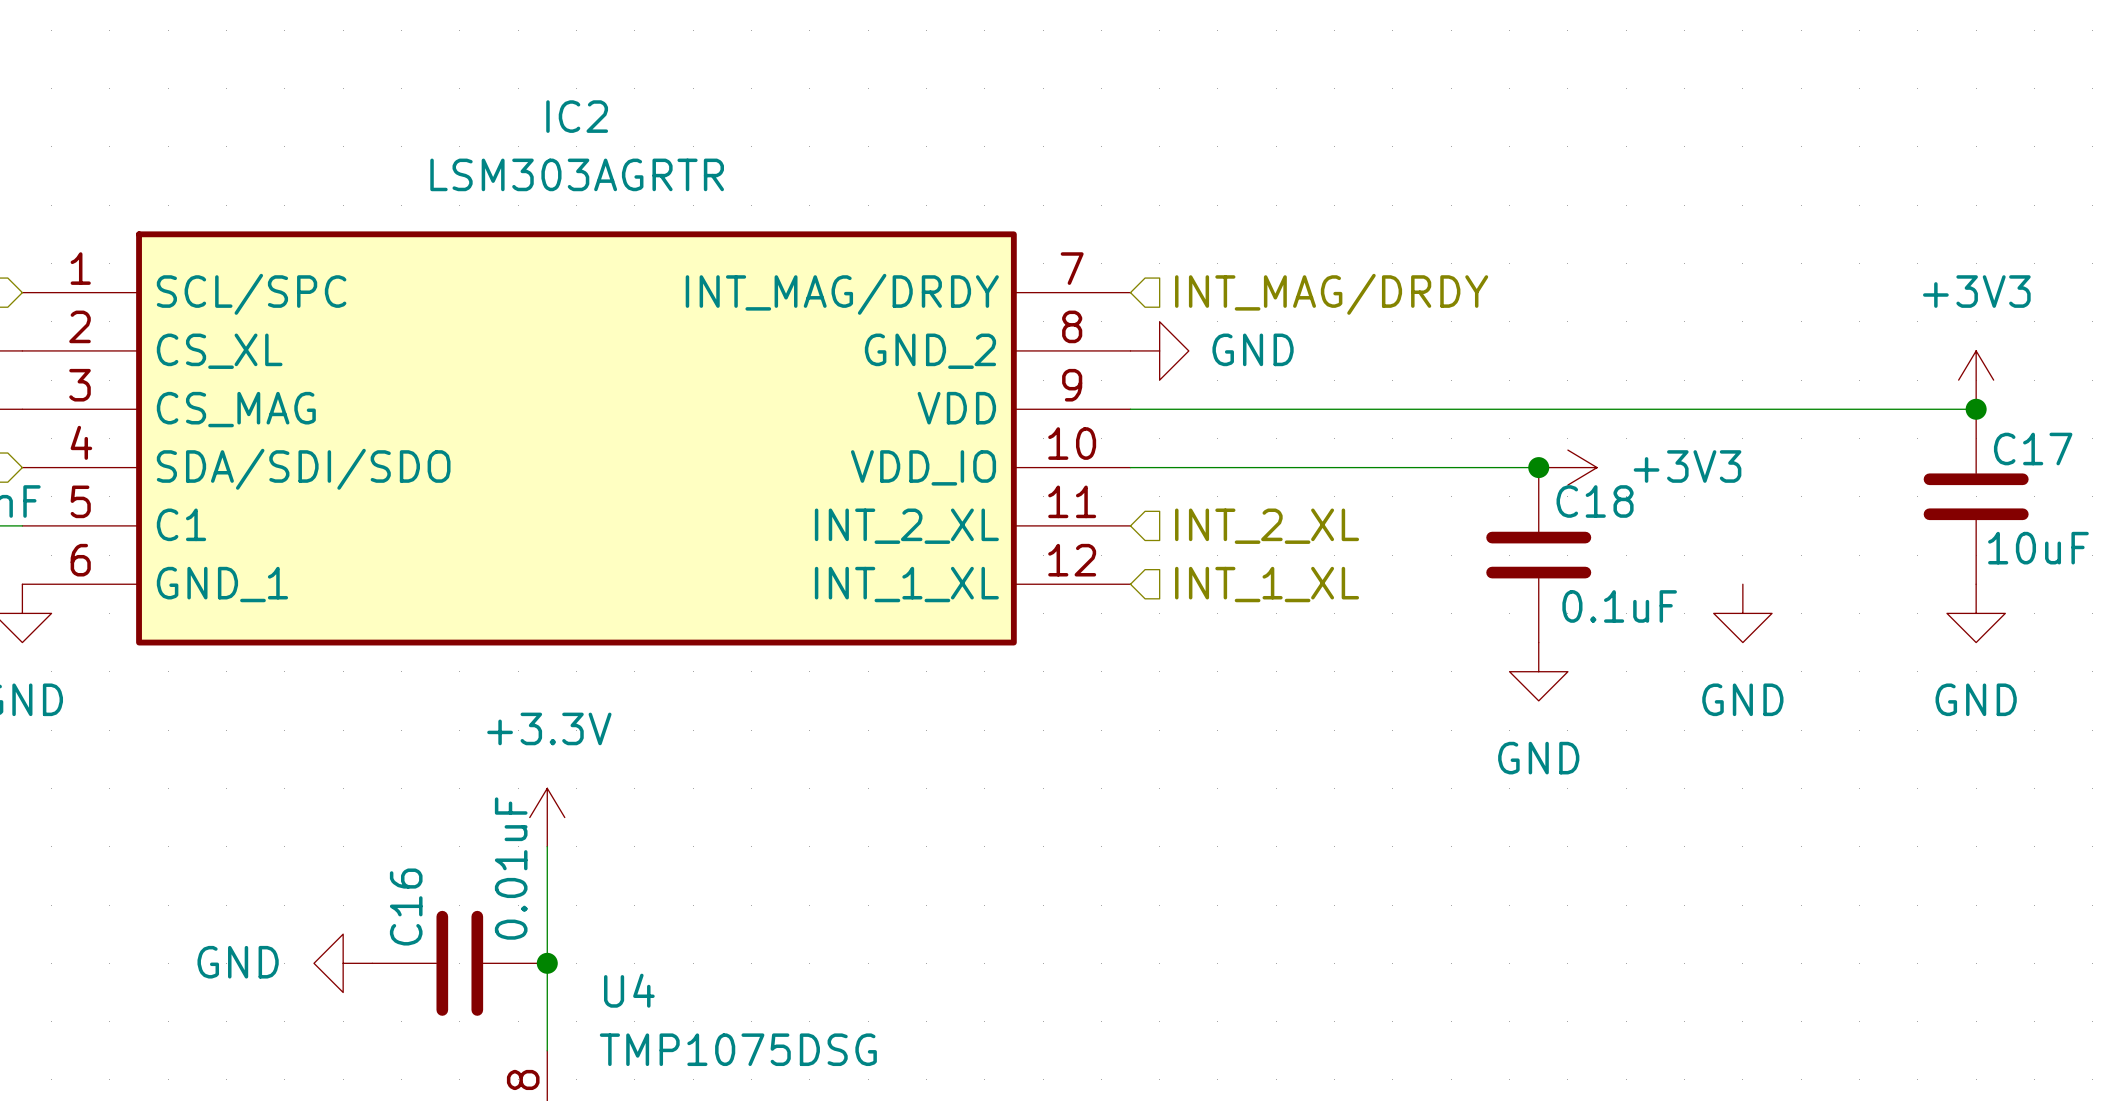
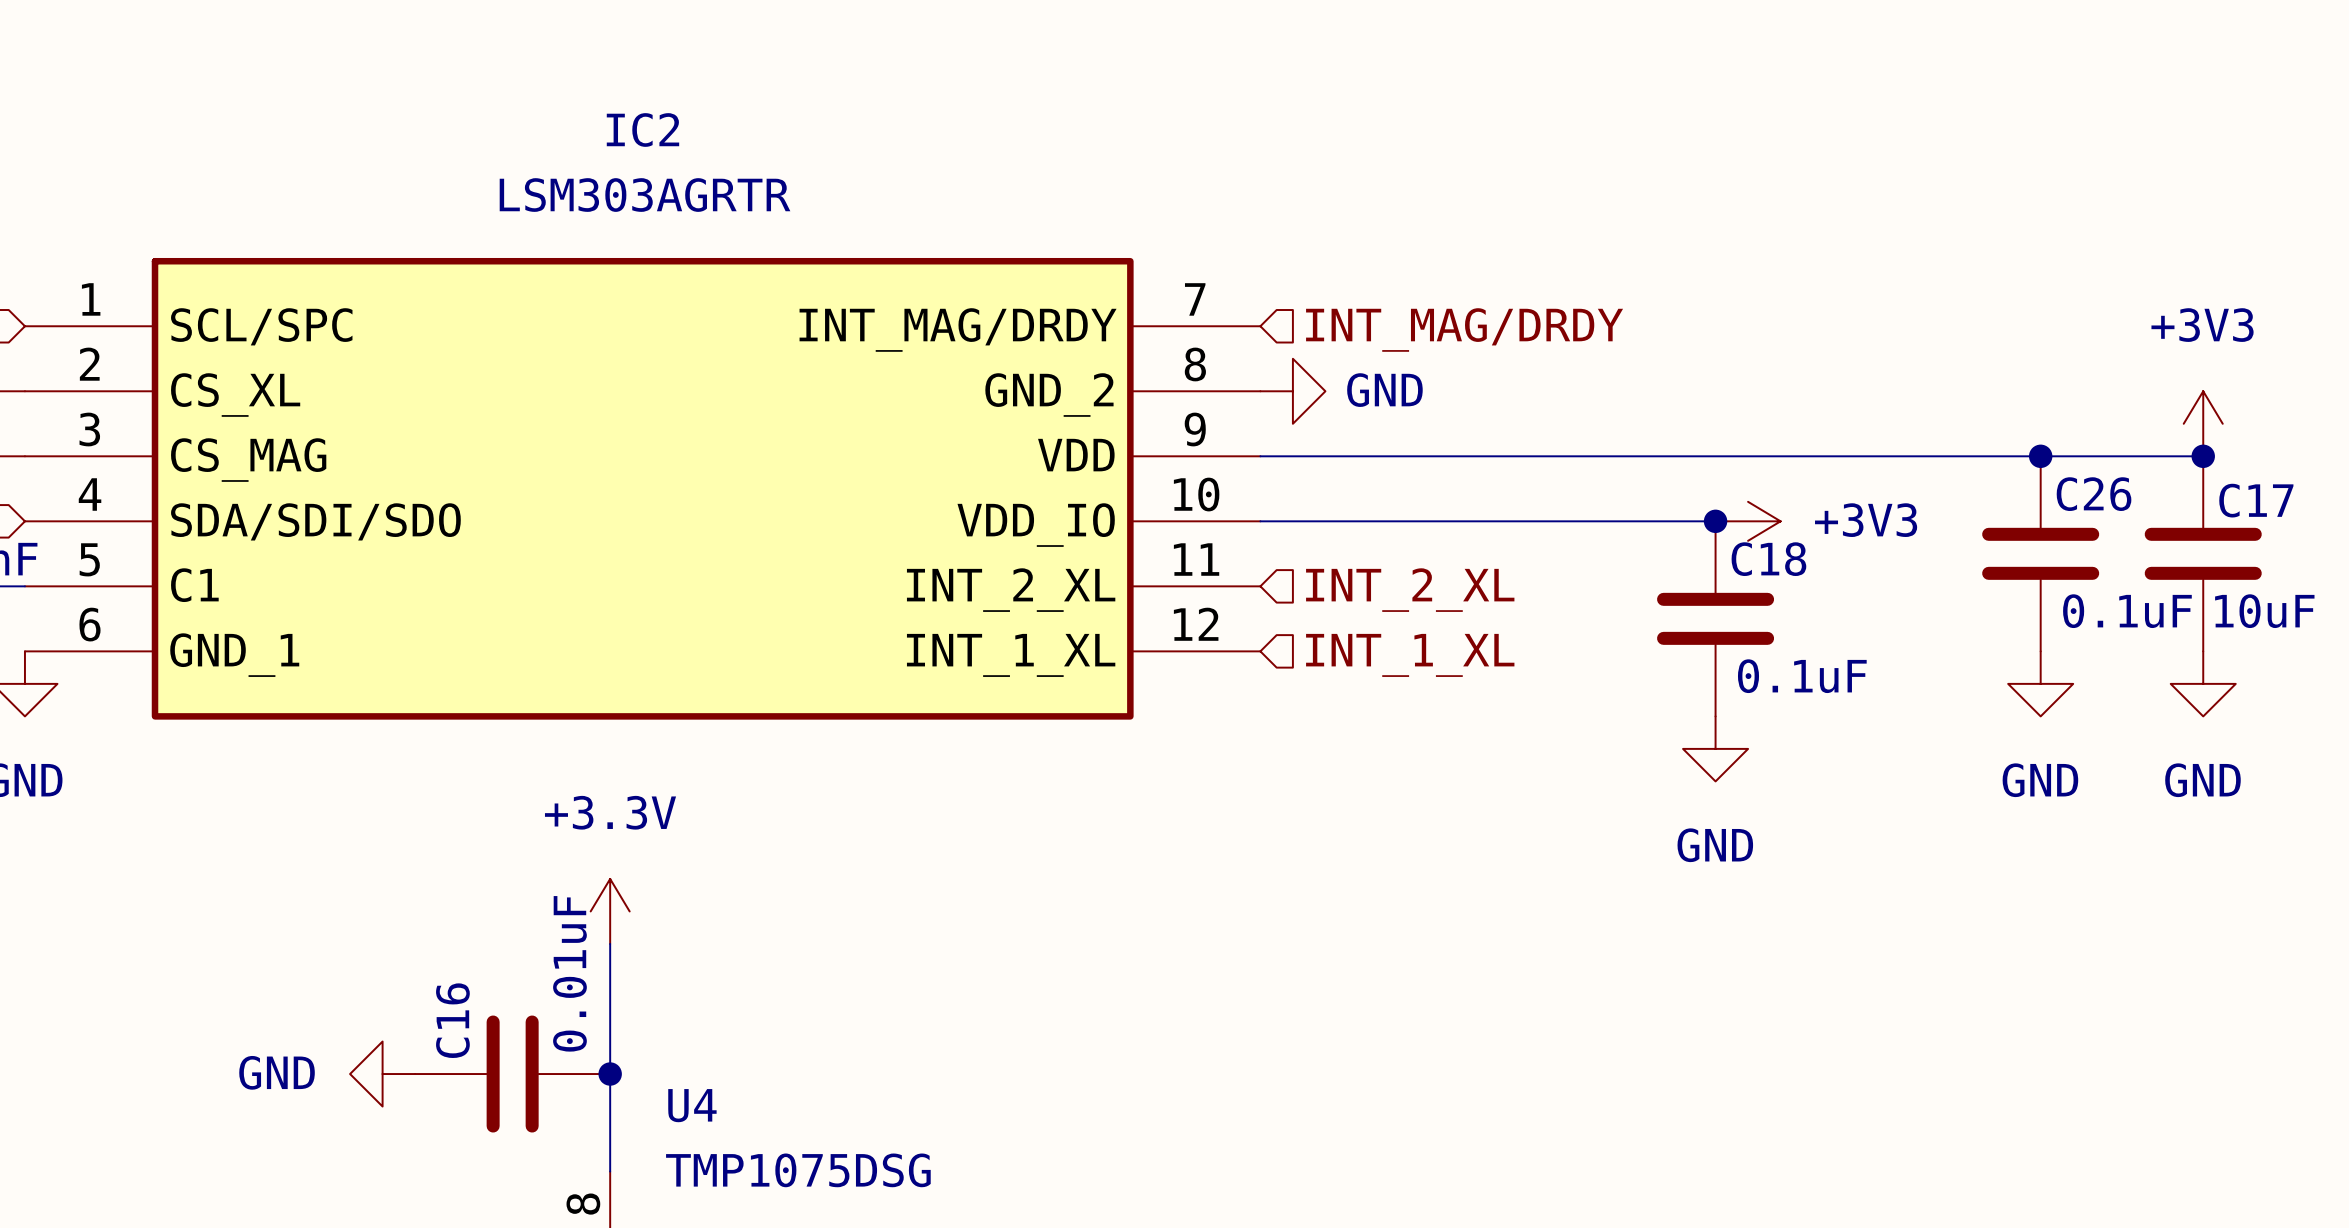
junction: none -> (2040, 456)
C26: none -> 0.1uF (2040, 553)
power symbol position: GND (1742, 613) -> GND (2040, 683)

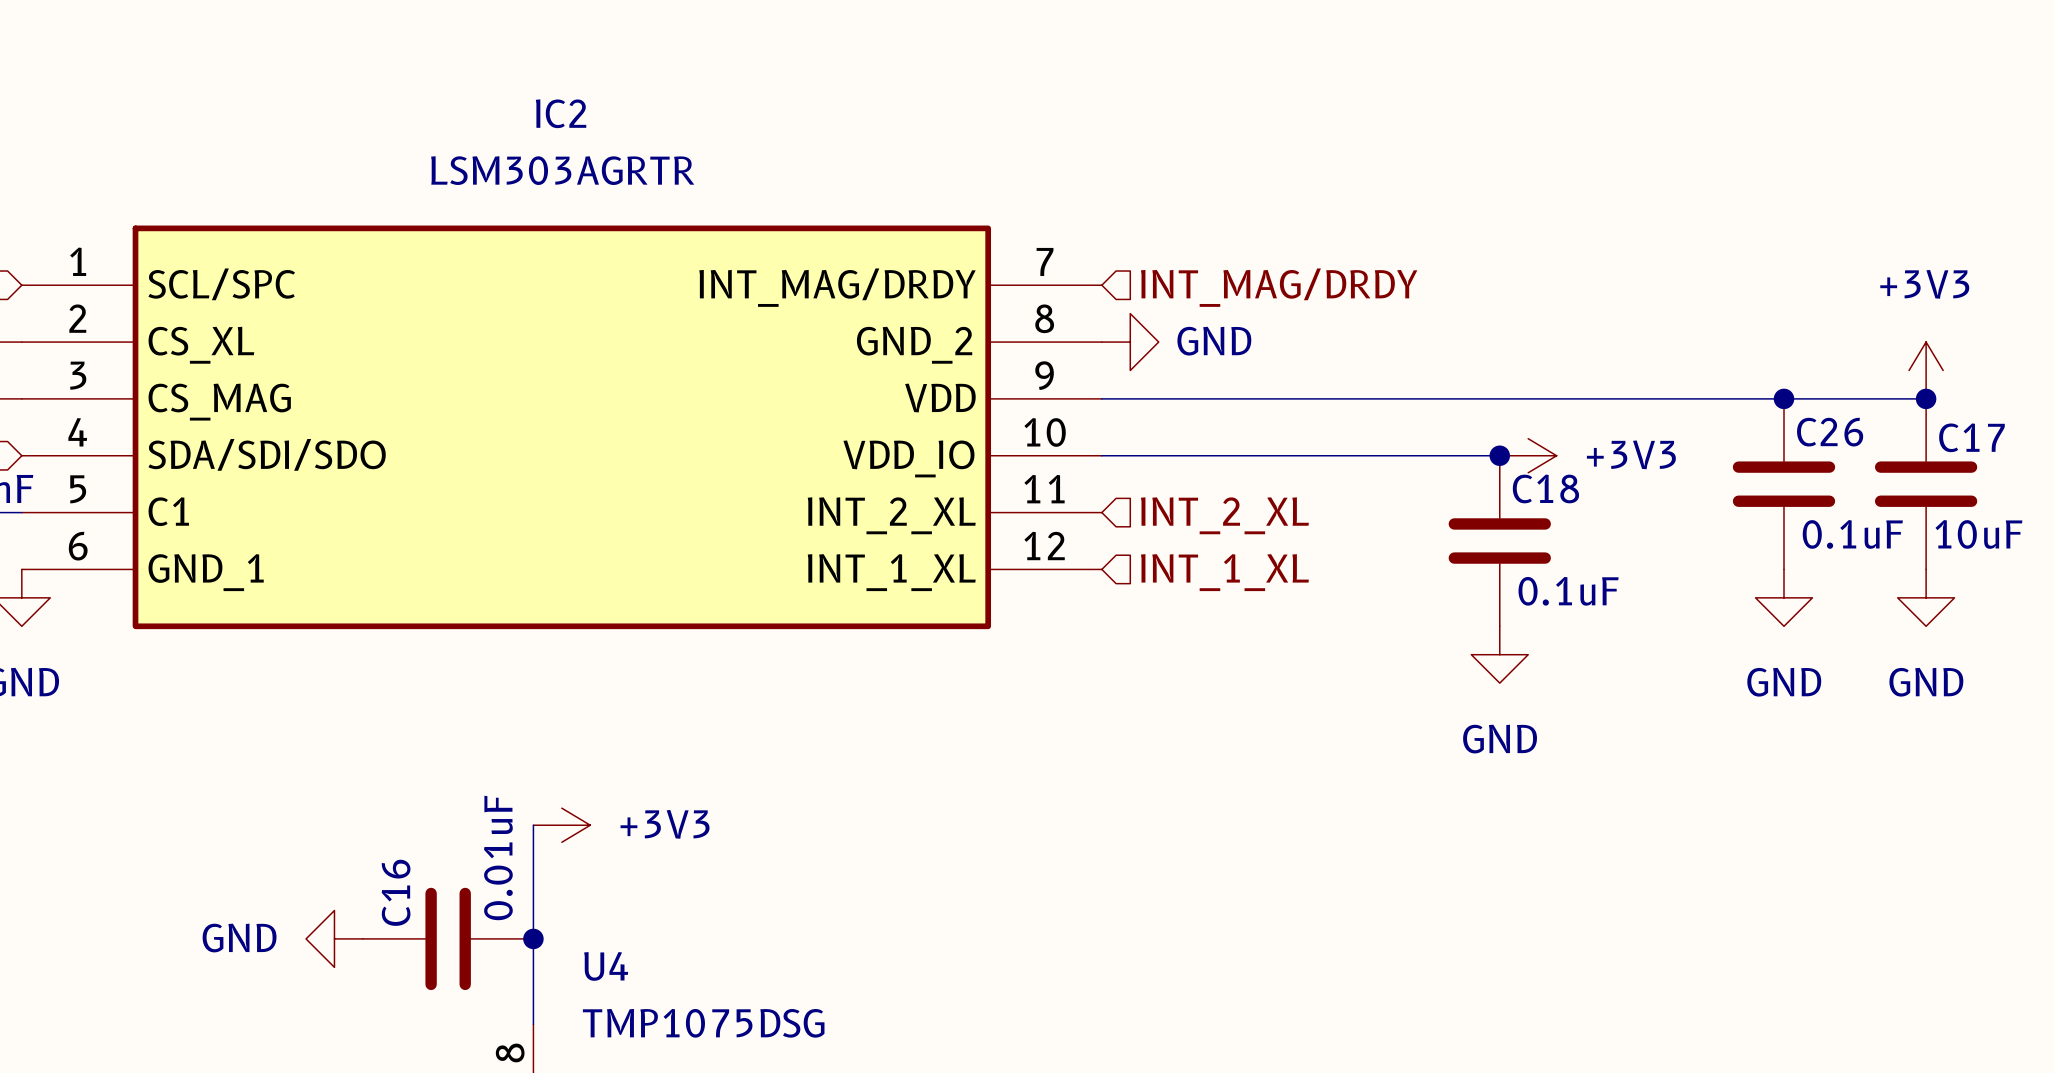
power symbol: +3.3V (610, 911) -> none
power symbol: none -> +3V3 (561, 825)

